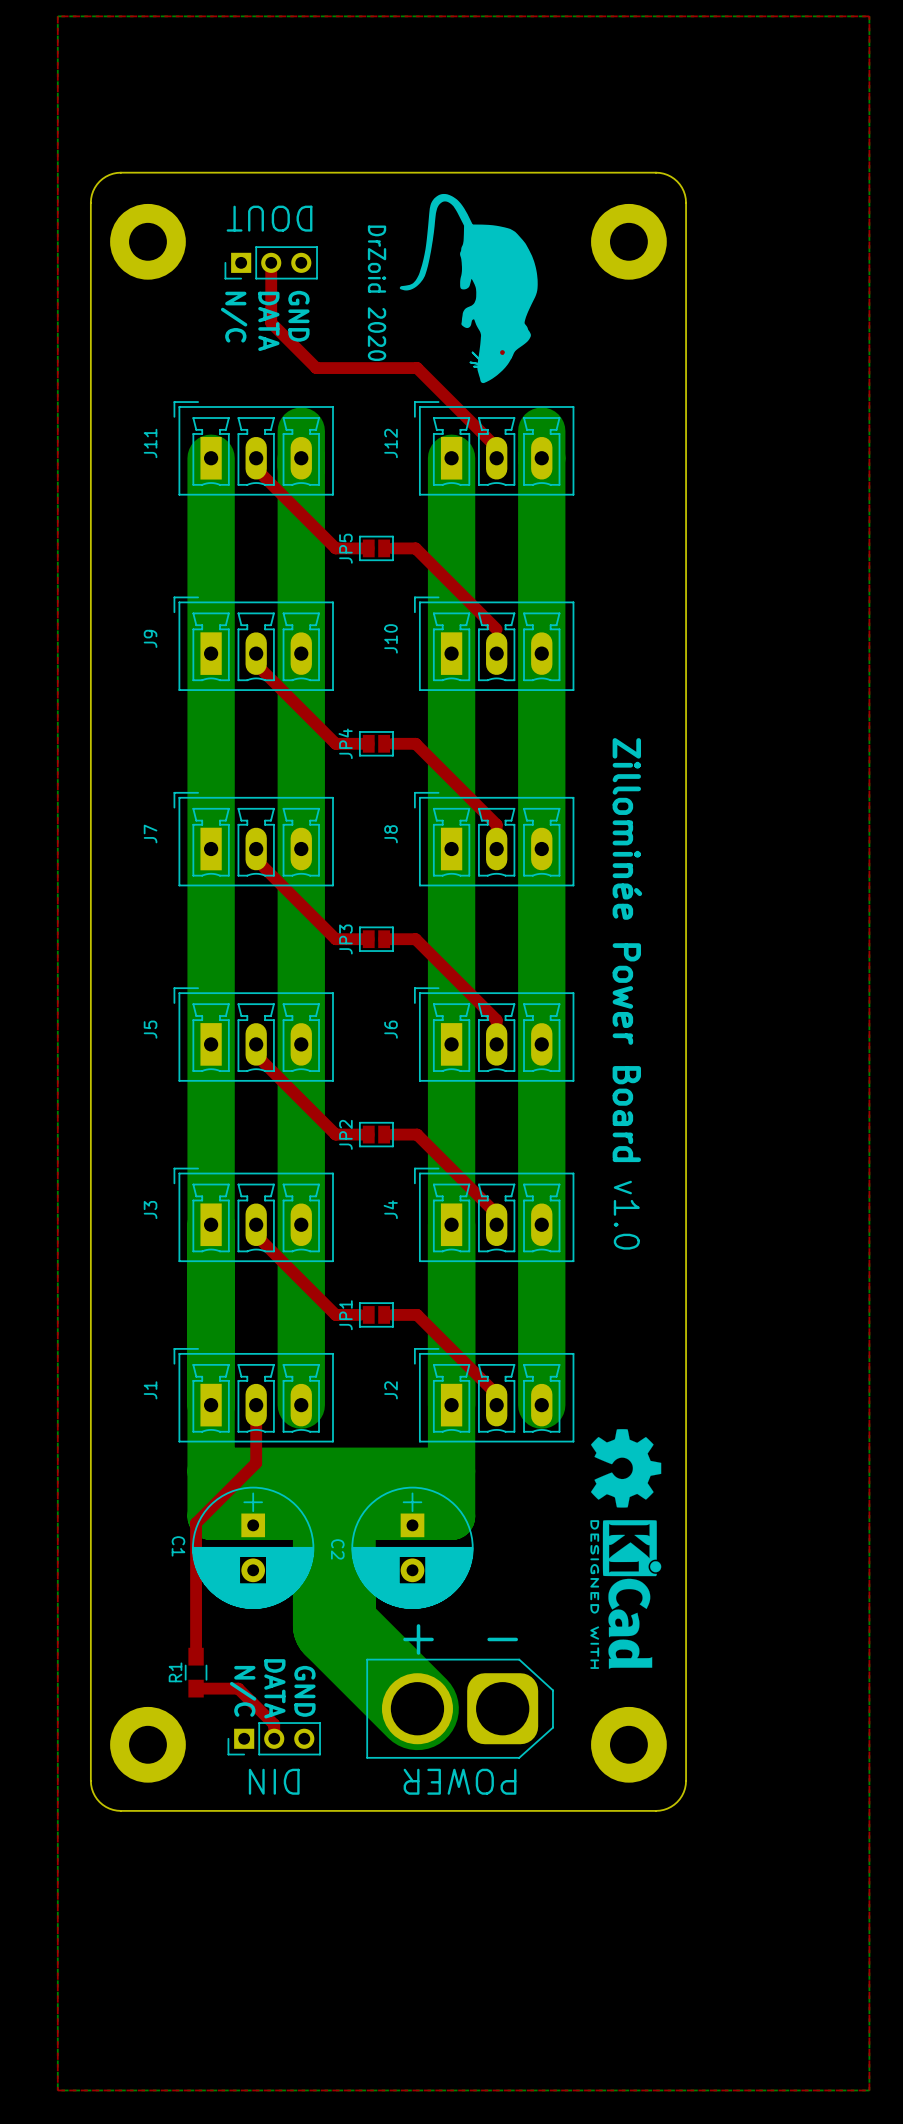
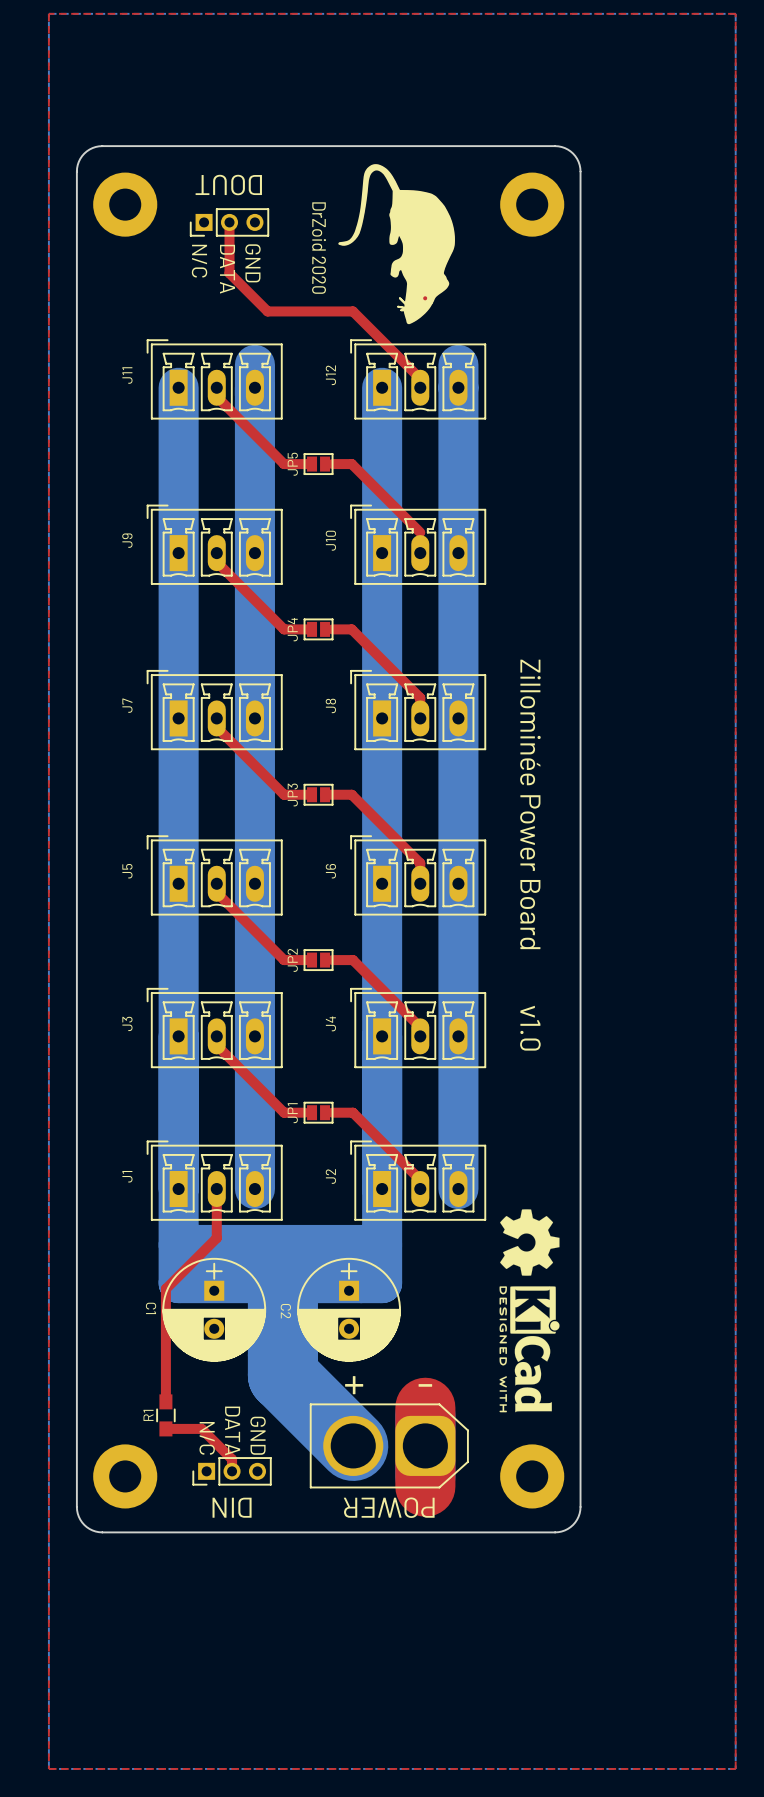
top track: none -> (425, 1407) (425, 1486)

